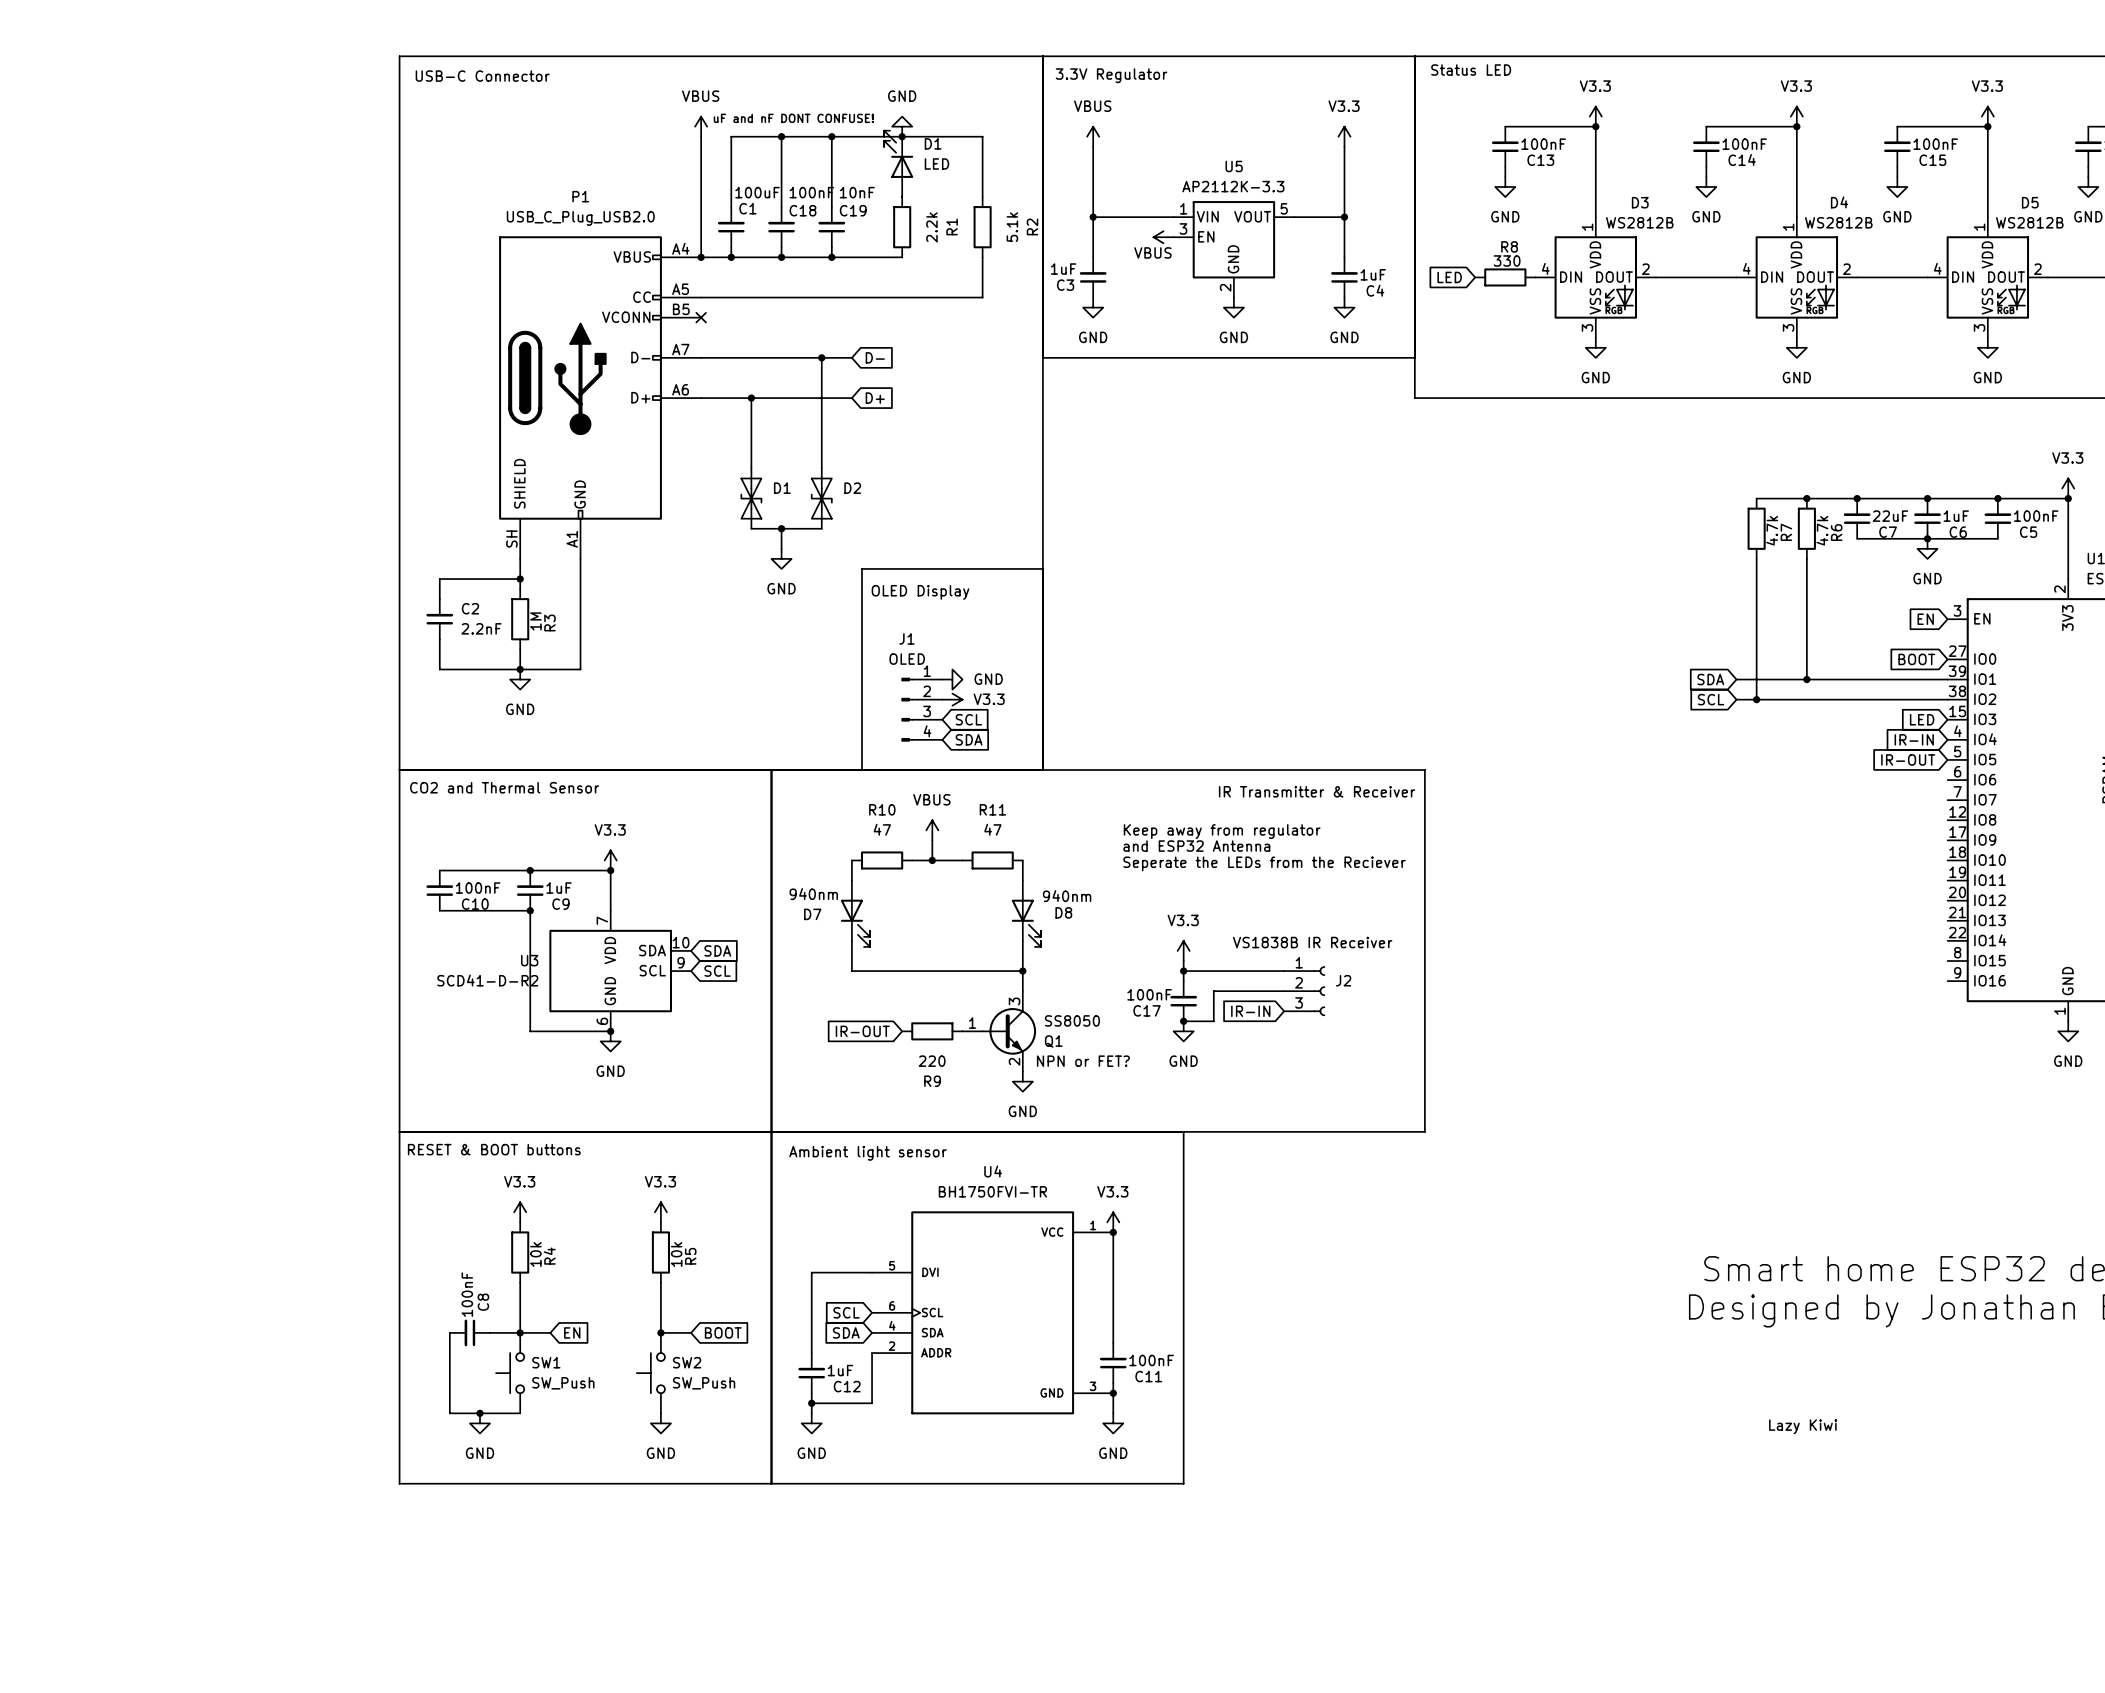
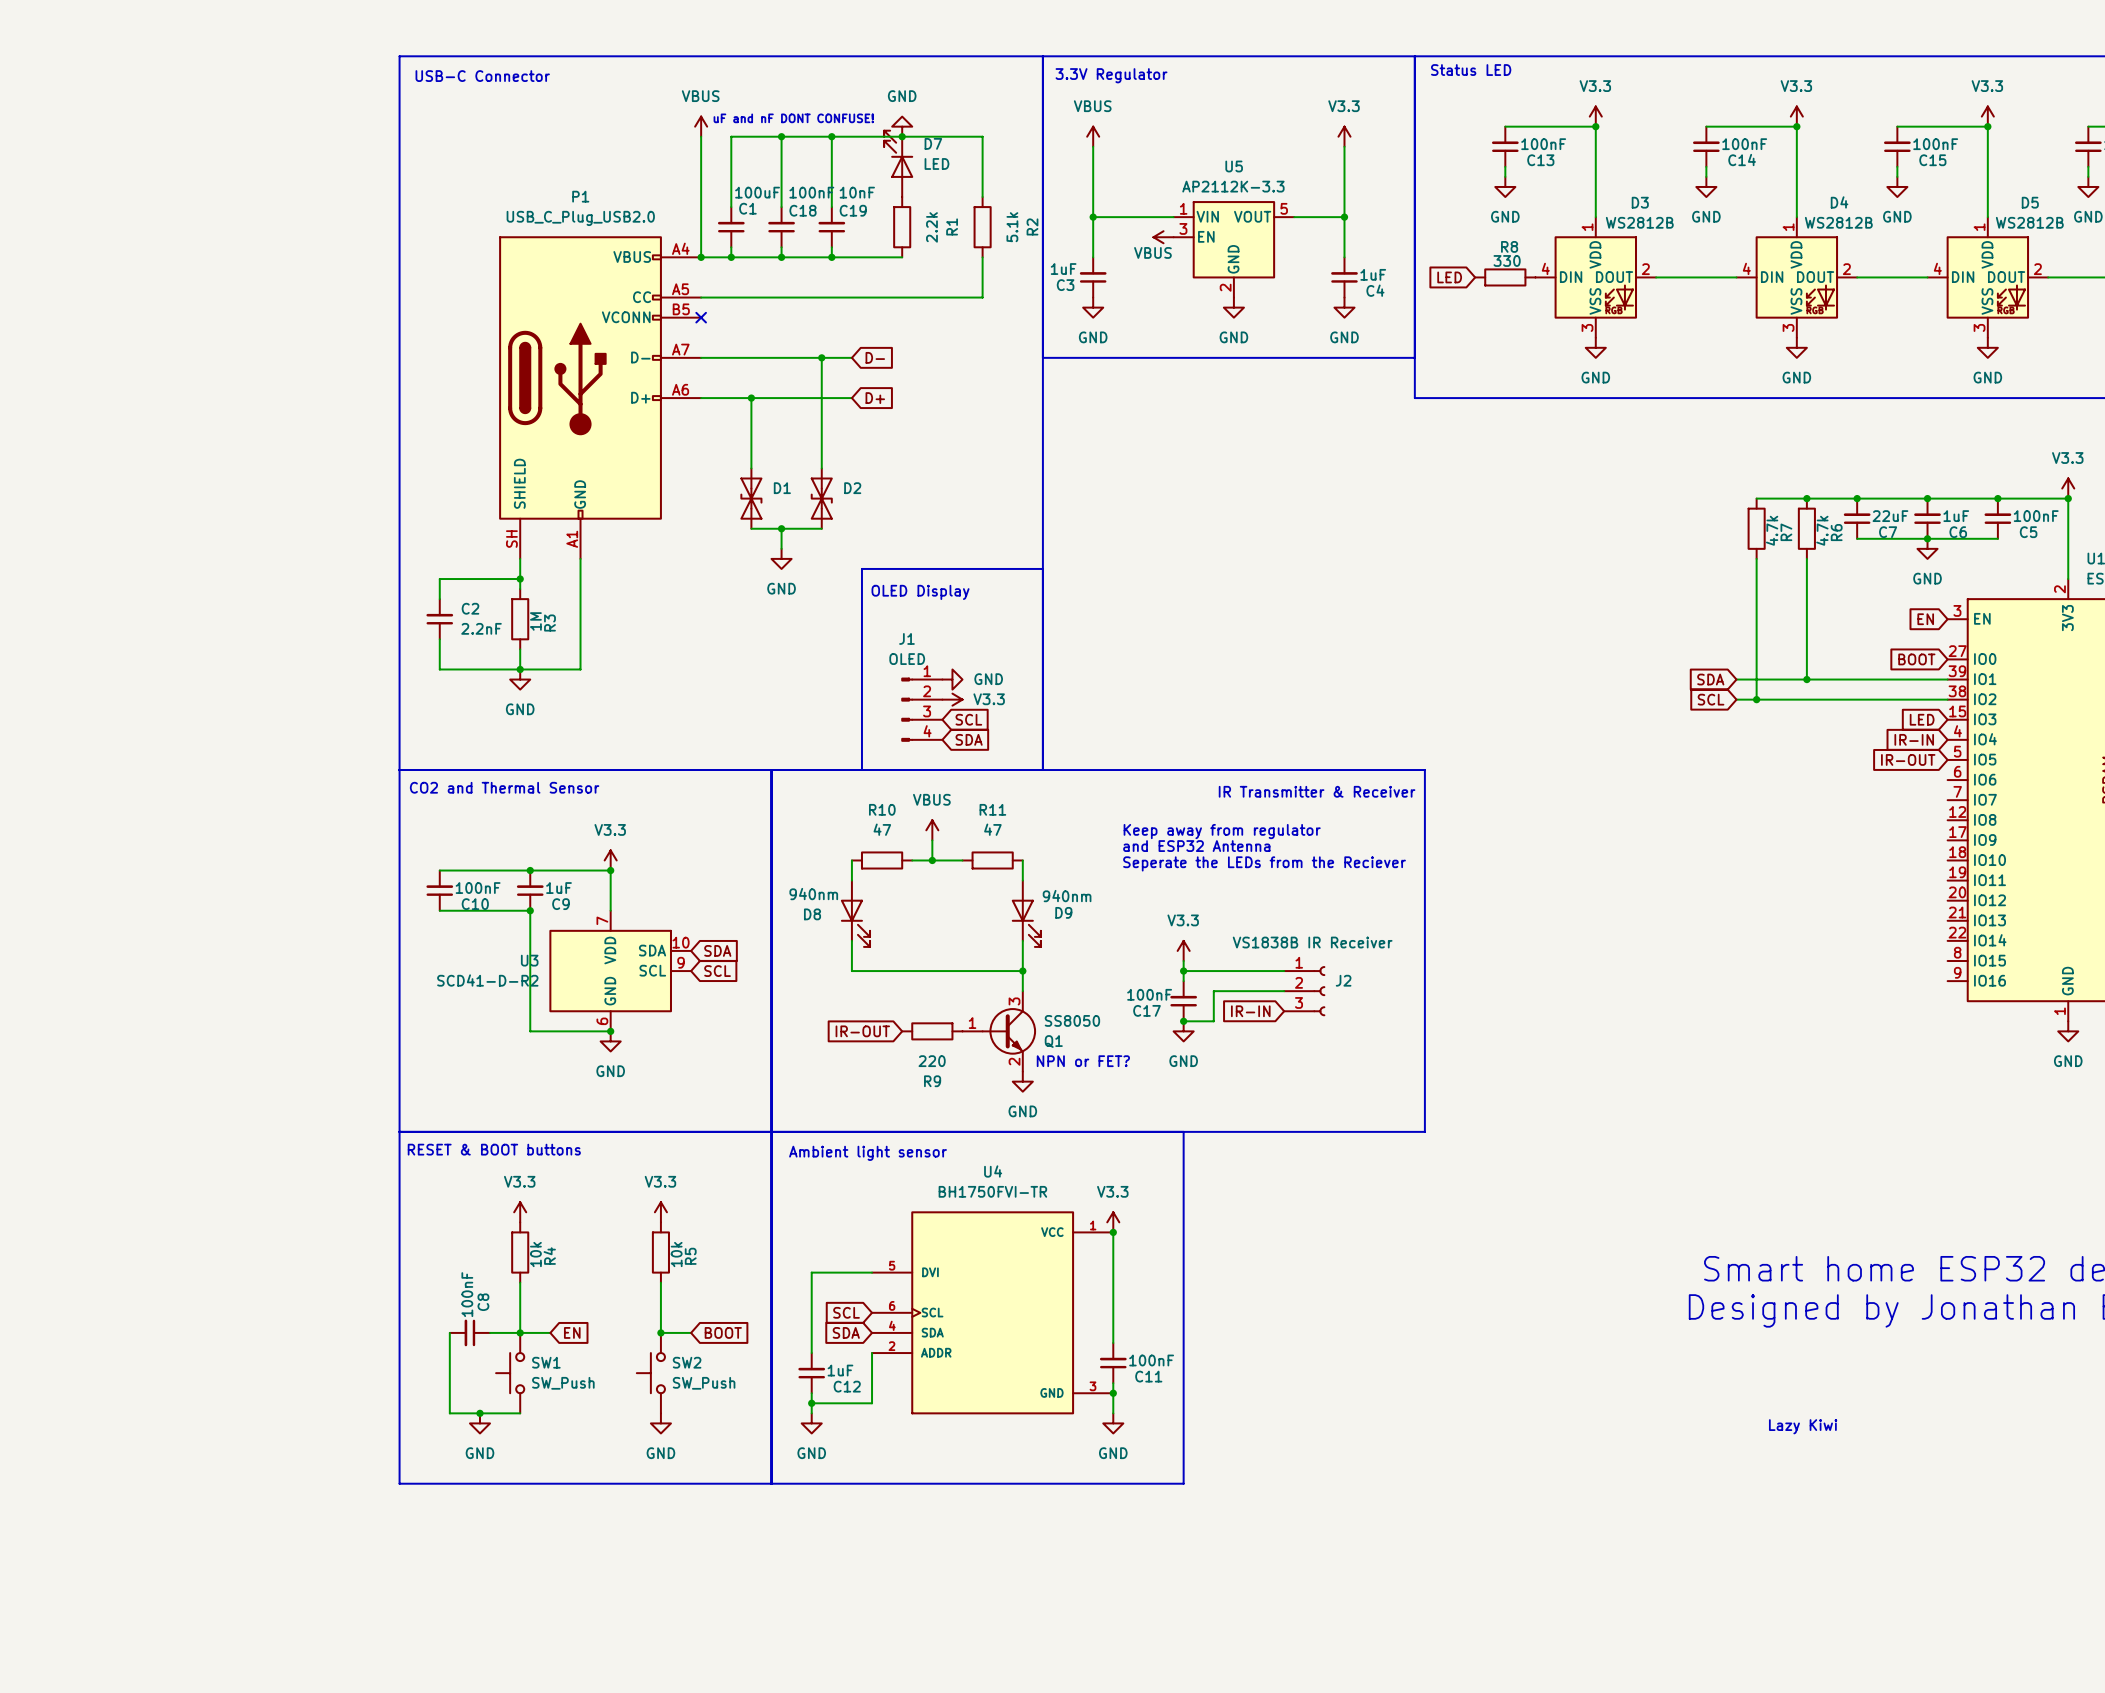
D1 name: D1 (933, 143) -> D7 (933, 143)
D8 name: D8 (1063, 912) -> D9 (1063, 912)
D7 name: D7 (812, 914) -> D8 (812, 914)

